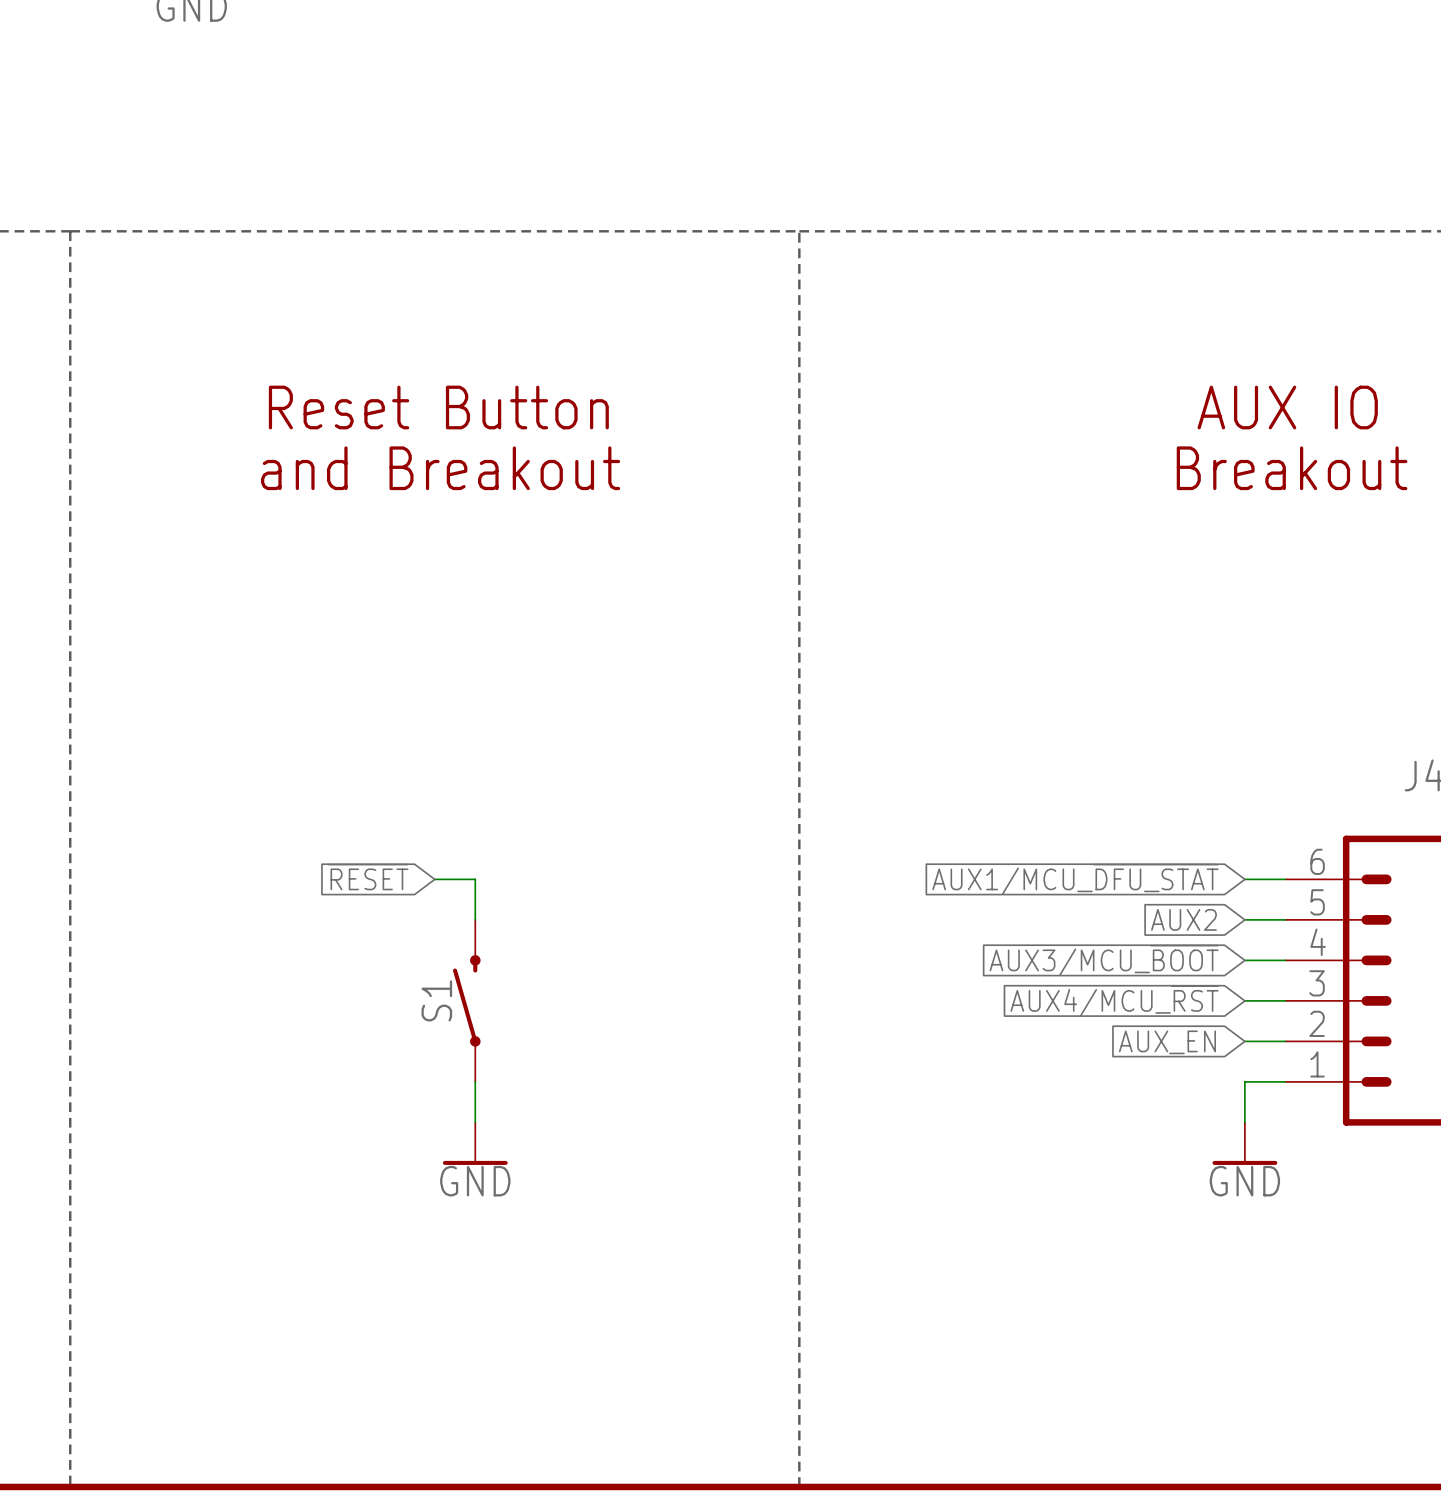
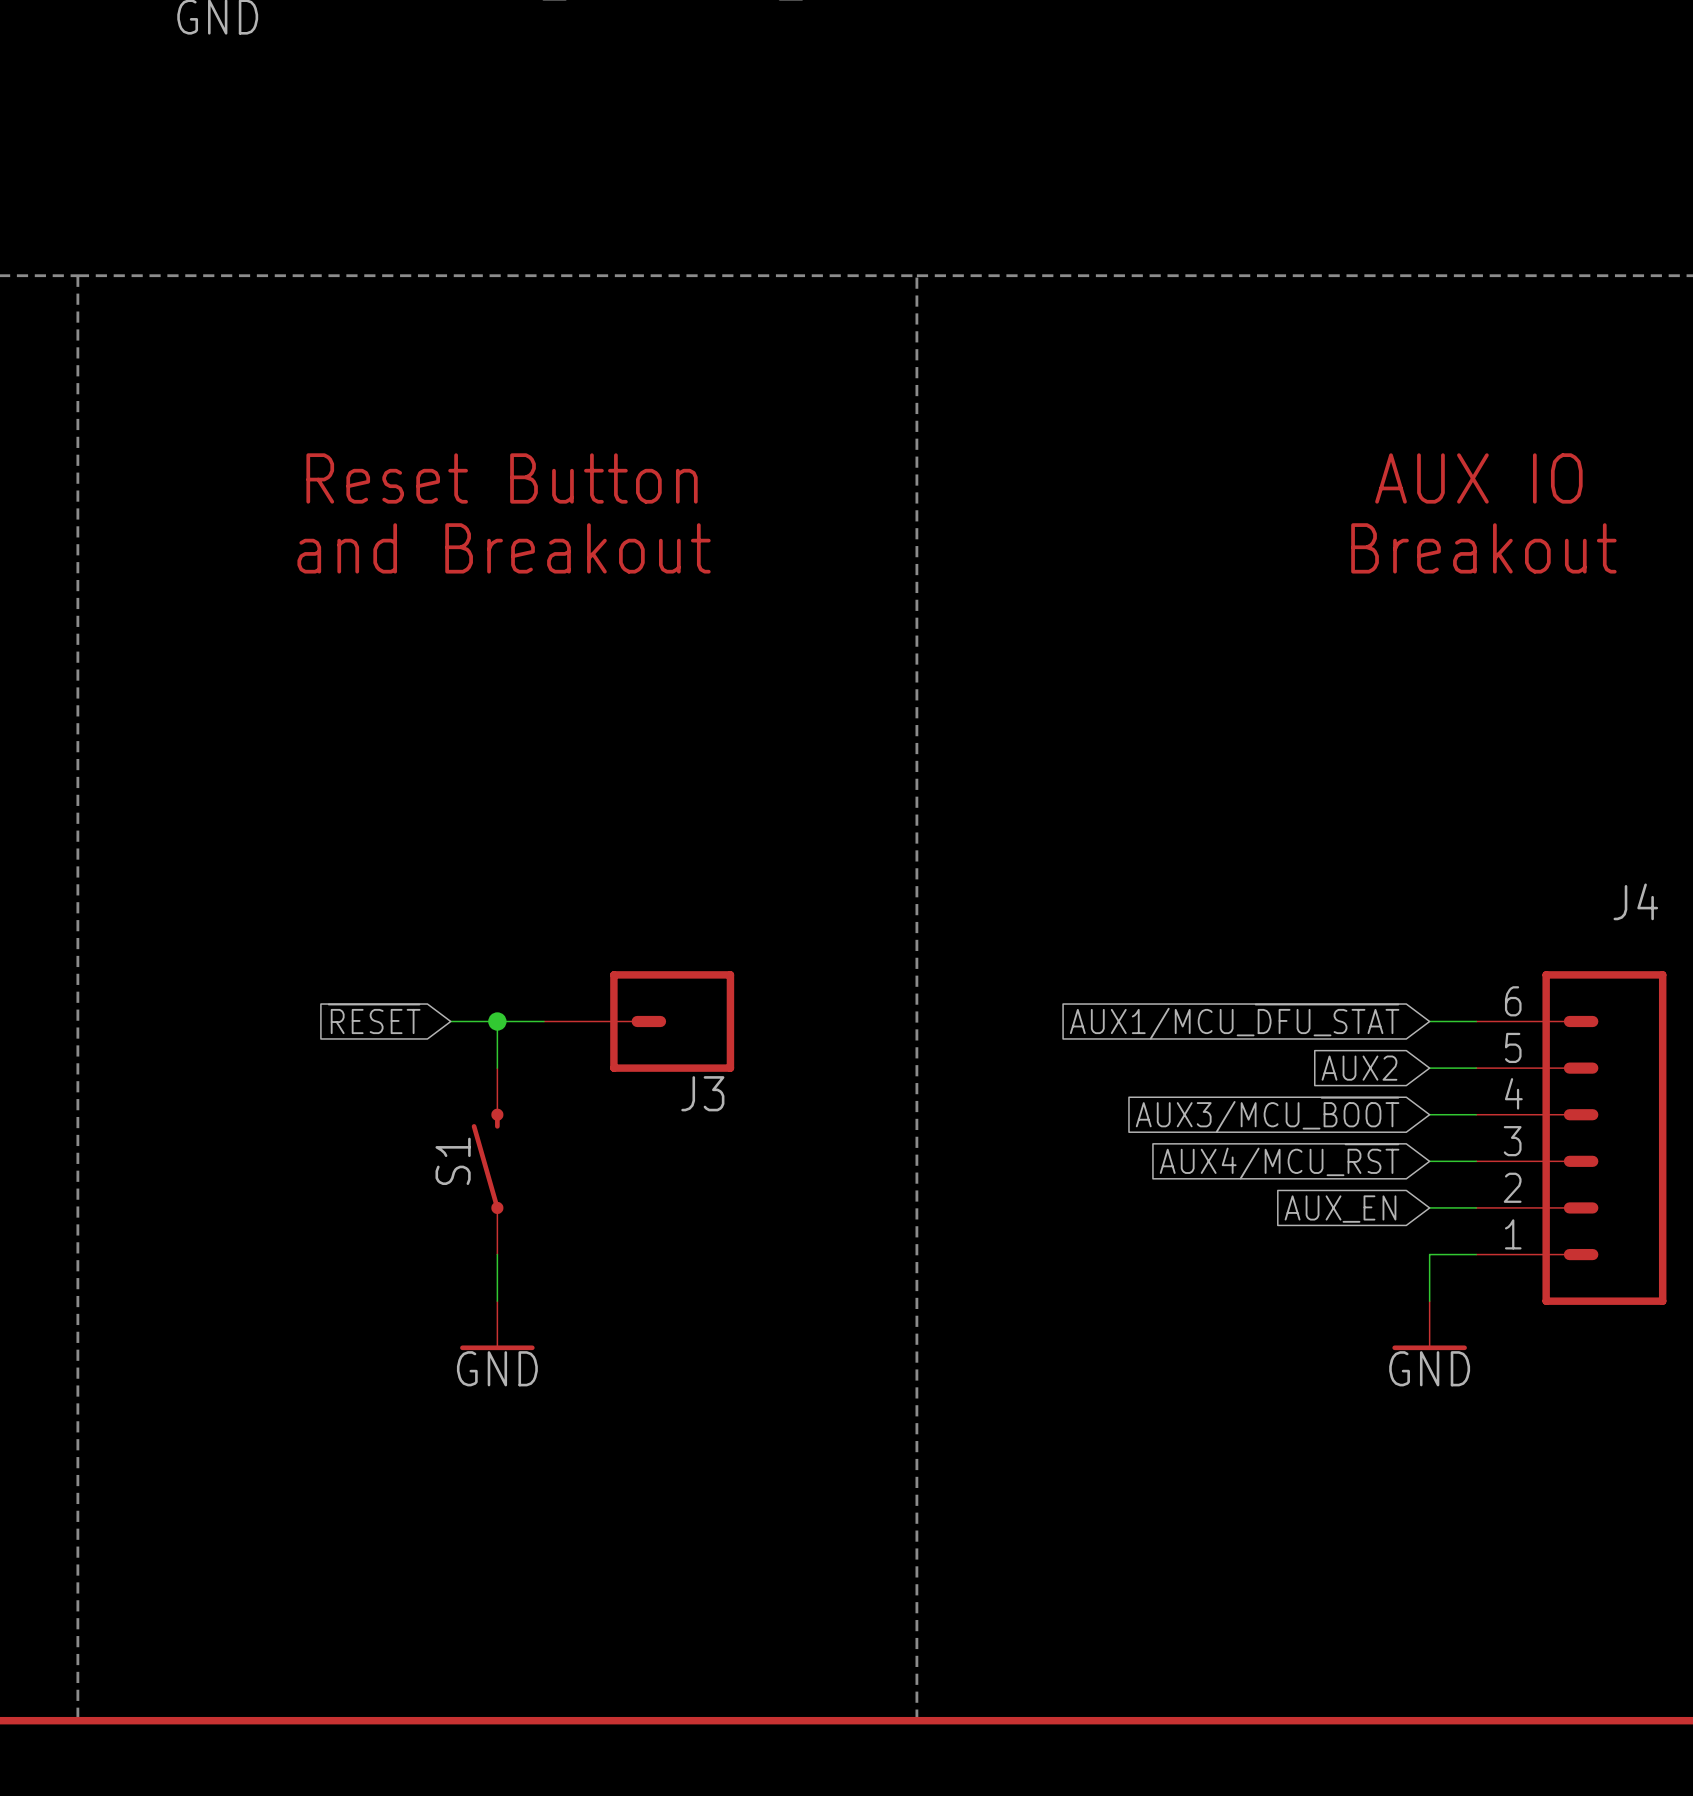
global label position: ~{RESET} (368, 877) -> ~{RESET} (374, 1018)
wire: none -> (450, 1021) (497, 1021) (497, 1068)
junction: none -> (497, 1021)
wire: (475, 879) (475, 919) -> none
J3: none -> (639, 1021)
S1 position: (466, 1000) -> (487, 1161)
wire: (475, 1081) (475, 1122) -> (497, 1254) (497, 1301)
power symbol position: GND (475, 1143) -> GND (497, 1325)

